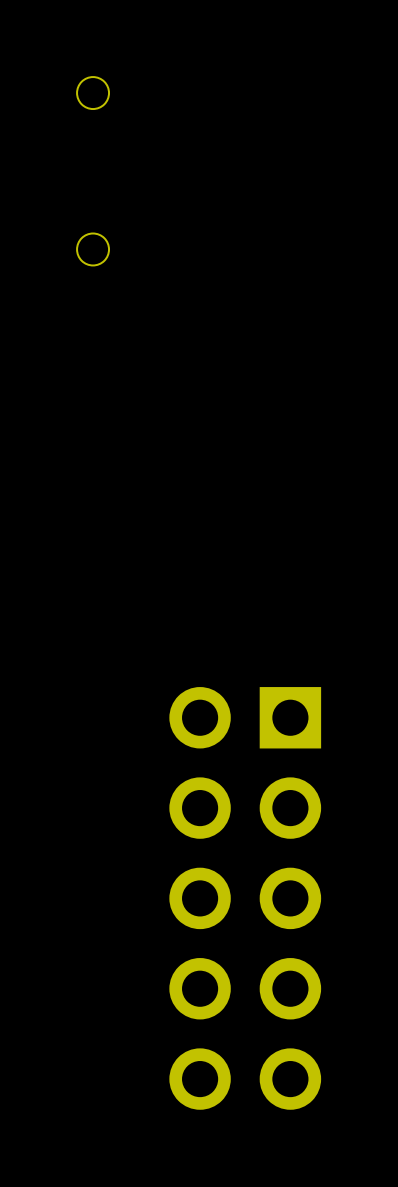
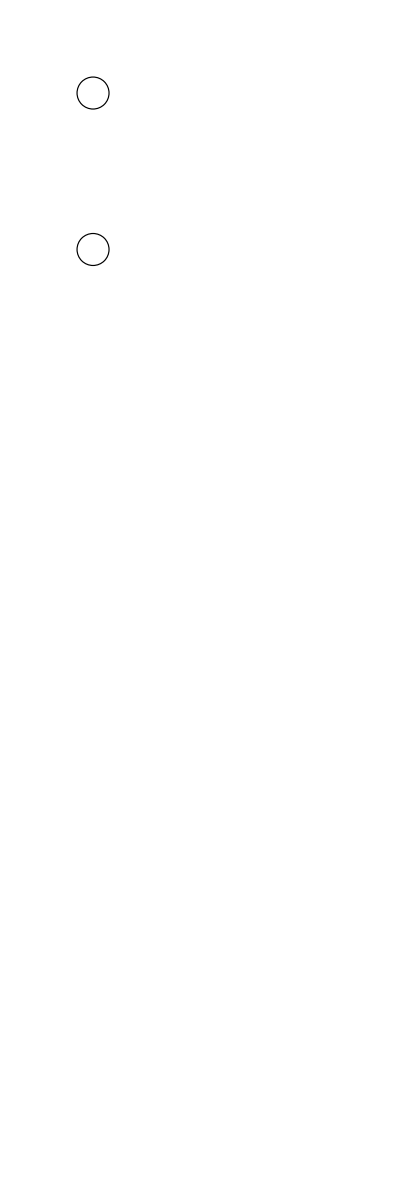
part: (245, 898) -> none

